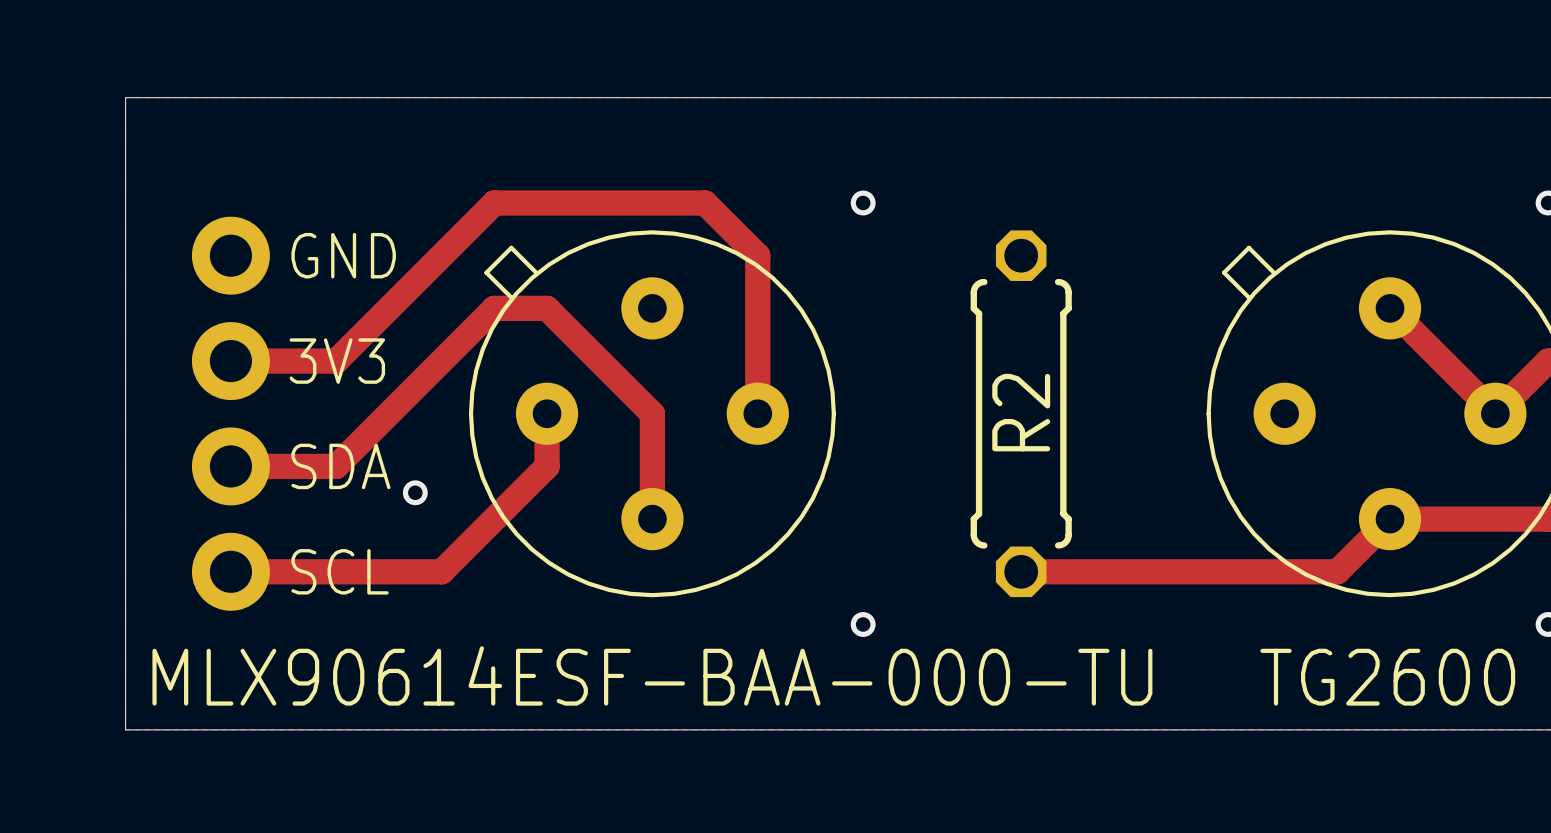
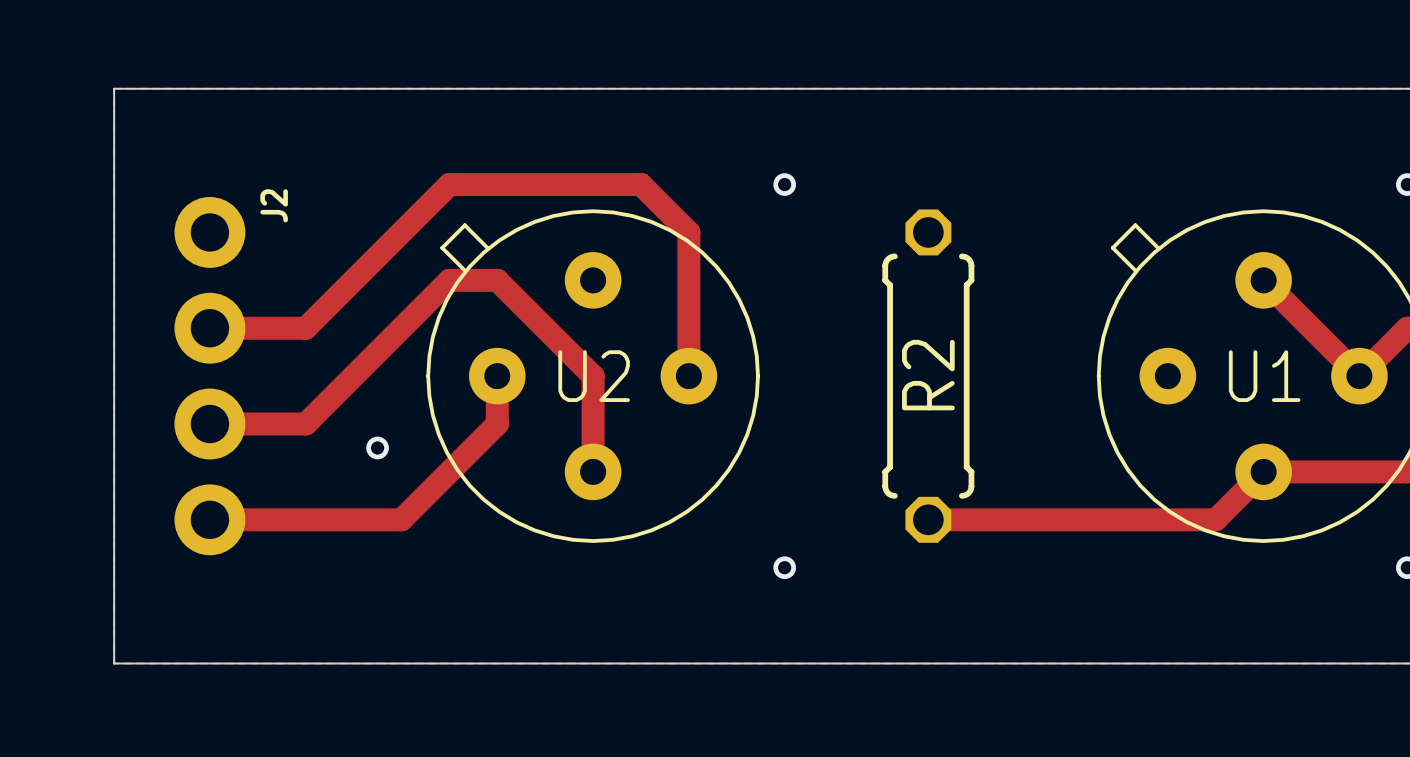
J2 name: none -> J2 (274, 205)
text: GND (343, 255) -> none
text: 3V3 (337, 361) -> none
U2 name: none -> U2 (594, 376)
U1 name: none -> U1 (1264, 376)
text: SDA (340, 466) -> none
text: SCL (340, 571) -> none
U2 value: MLX90614ESF-BAA-000-TU (652, 675) -> none
U1 value: TG2600 (1387, 677) -> none

